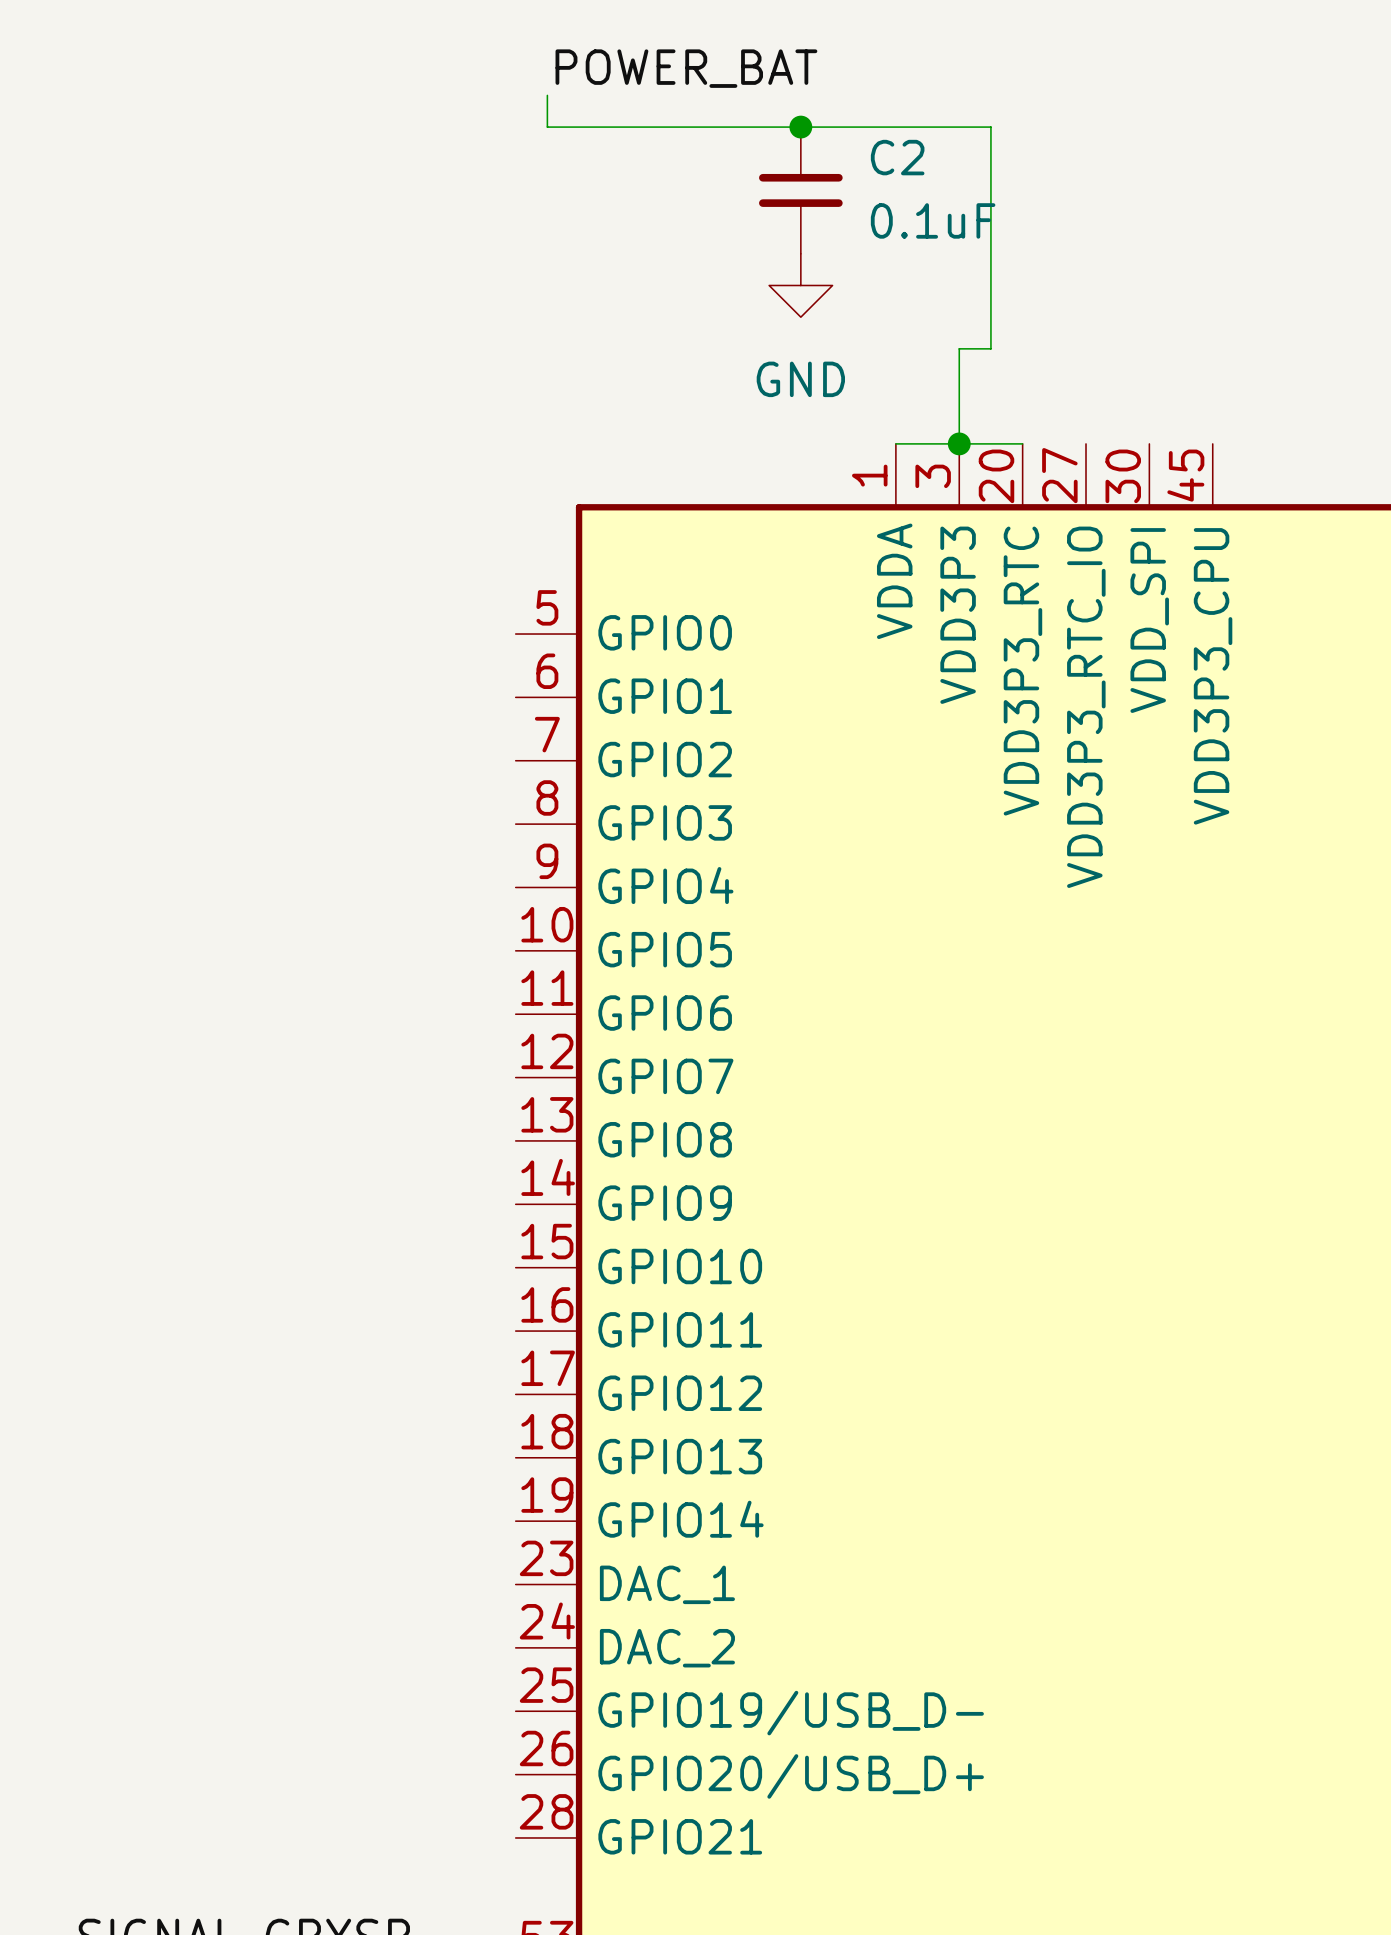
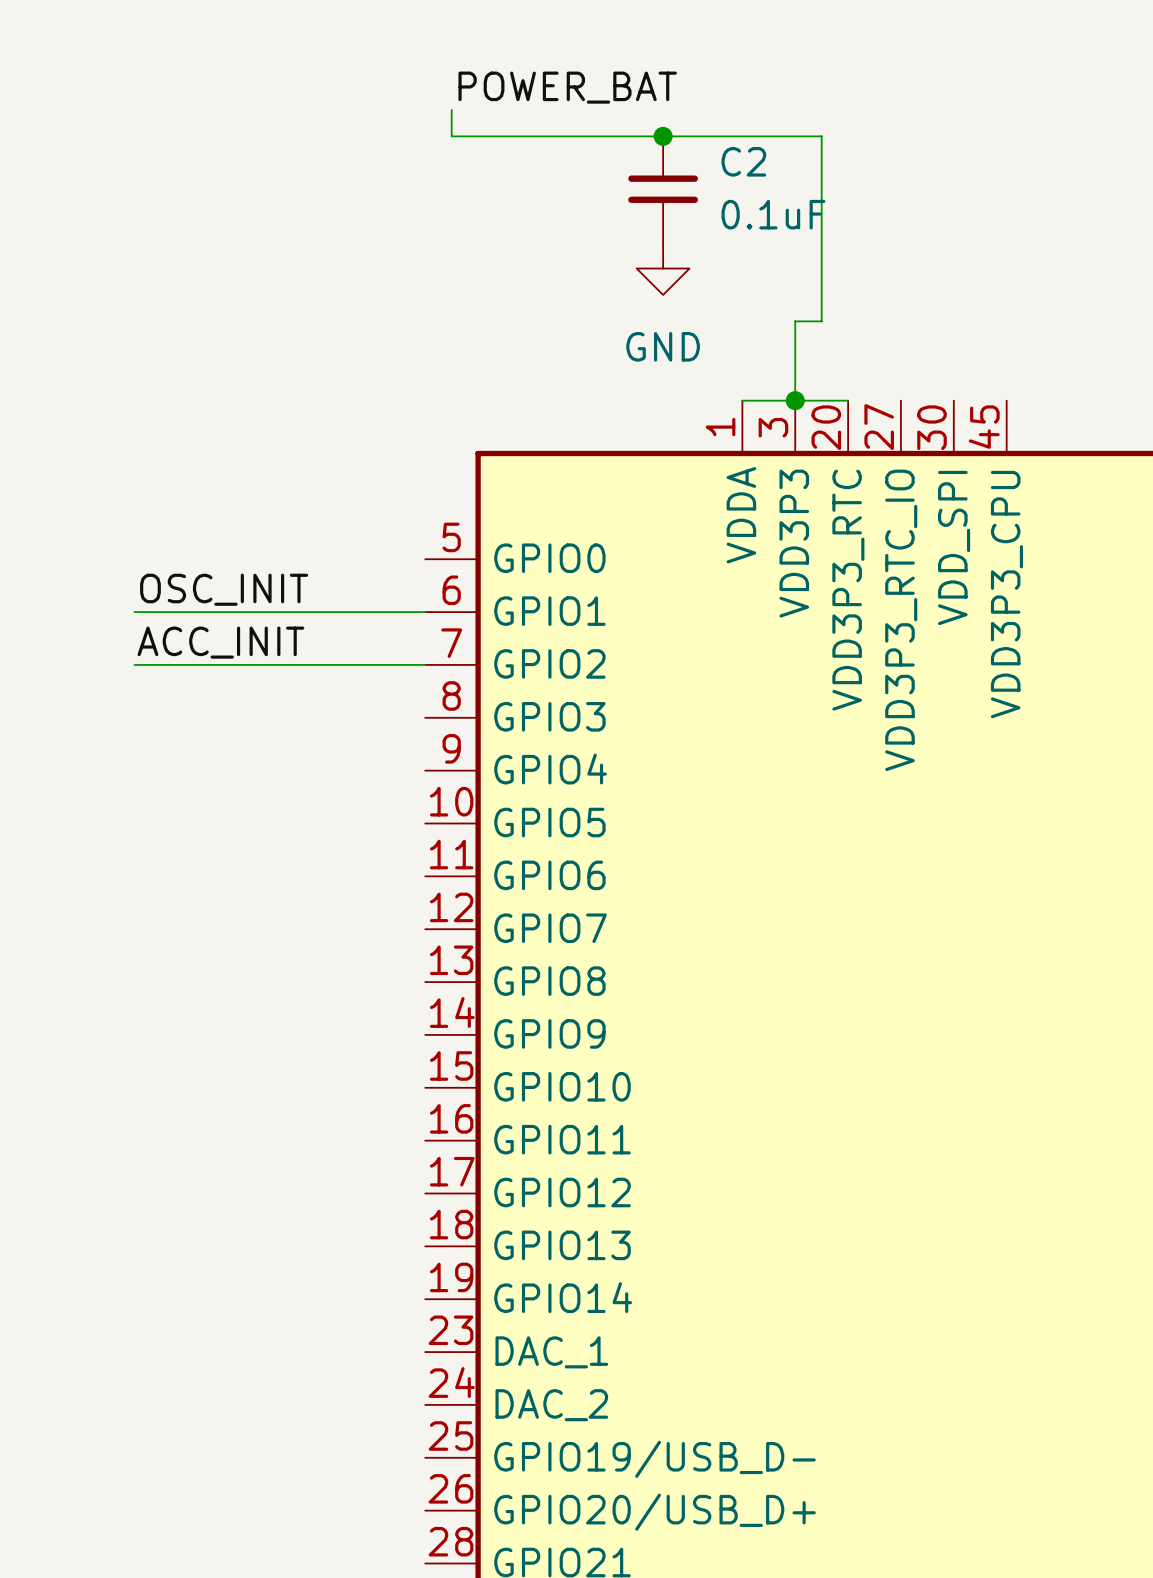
label: none -> OSC_INIT (224, 589)
wire: none -> (134, 612) (425, 612)
label: none -> ACC_INIT (220, 642)
wire: none -> (134, 664) (425, 664)

